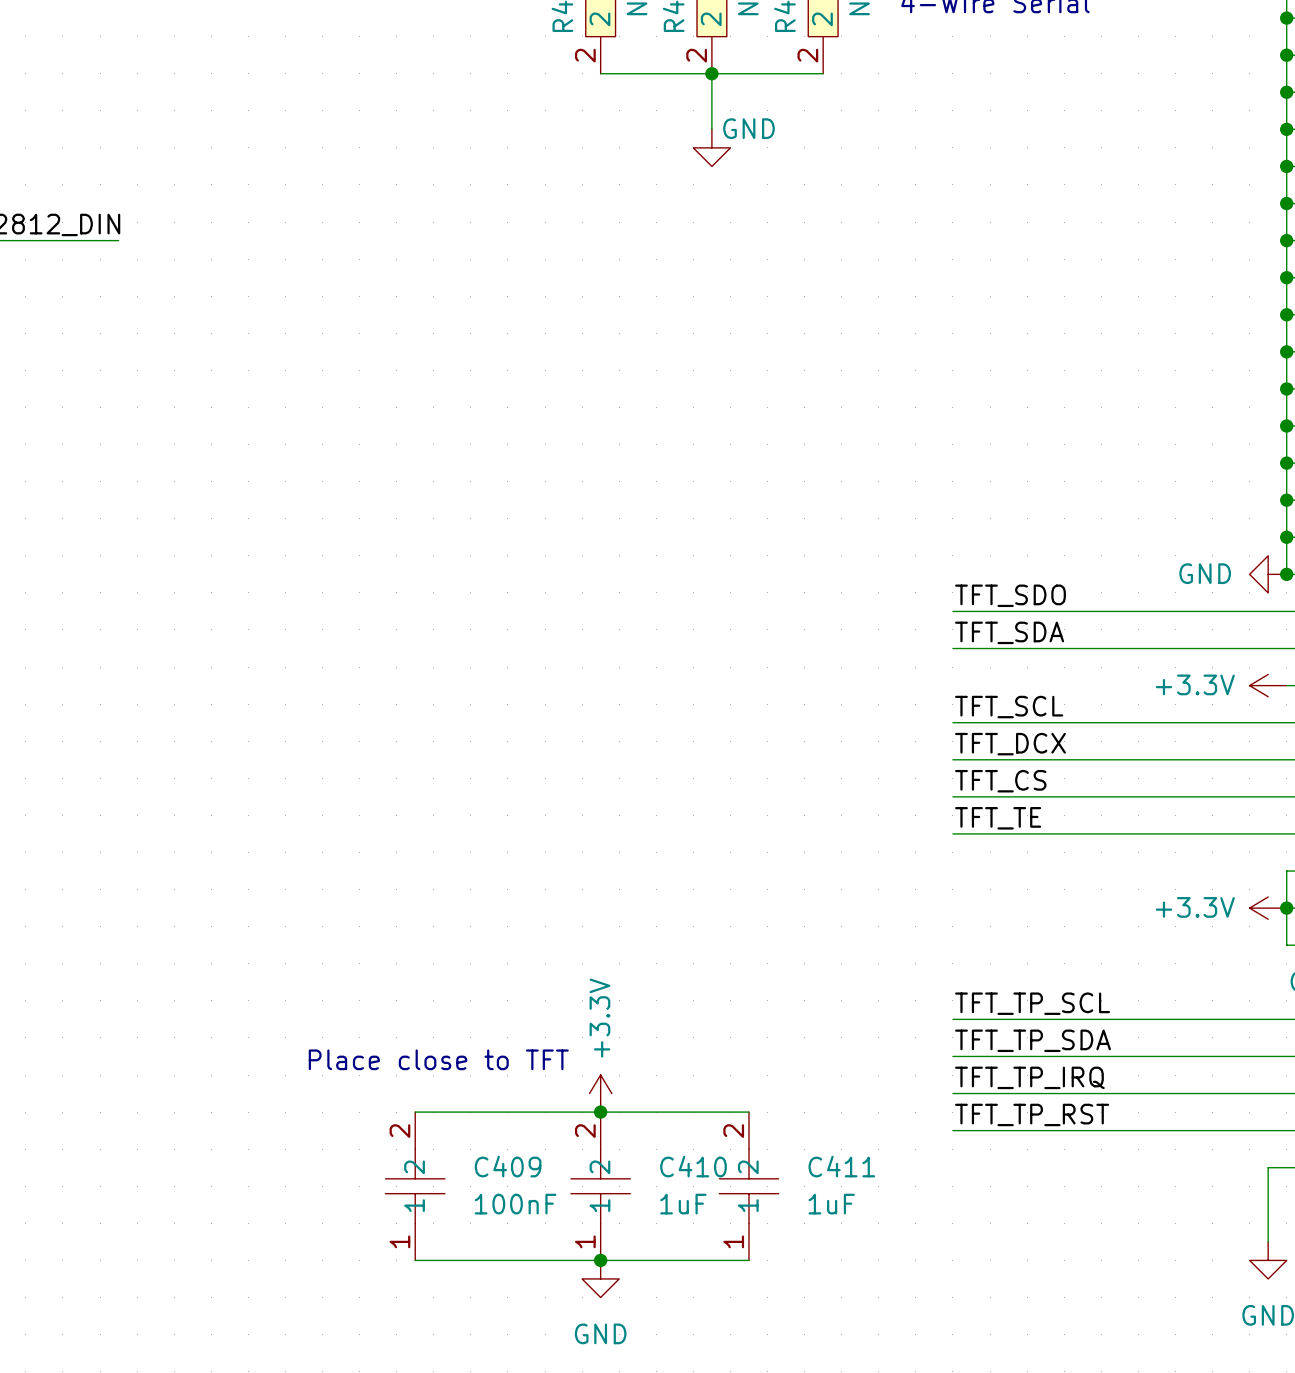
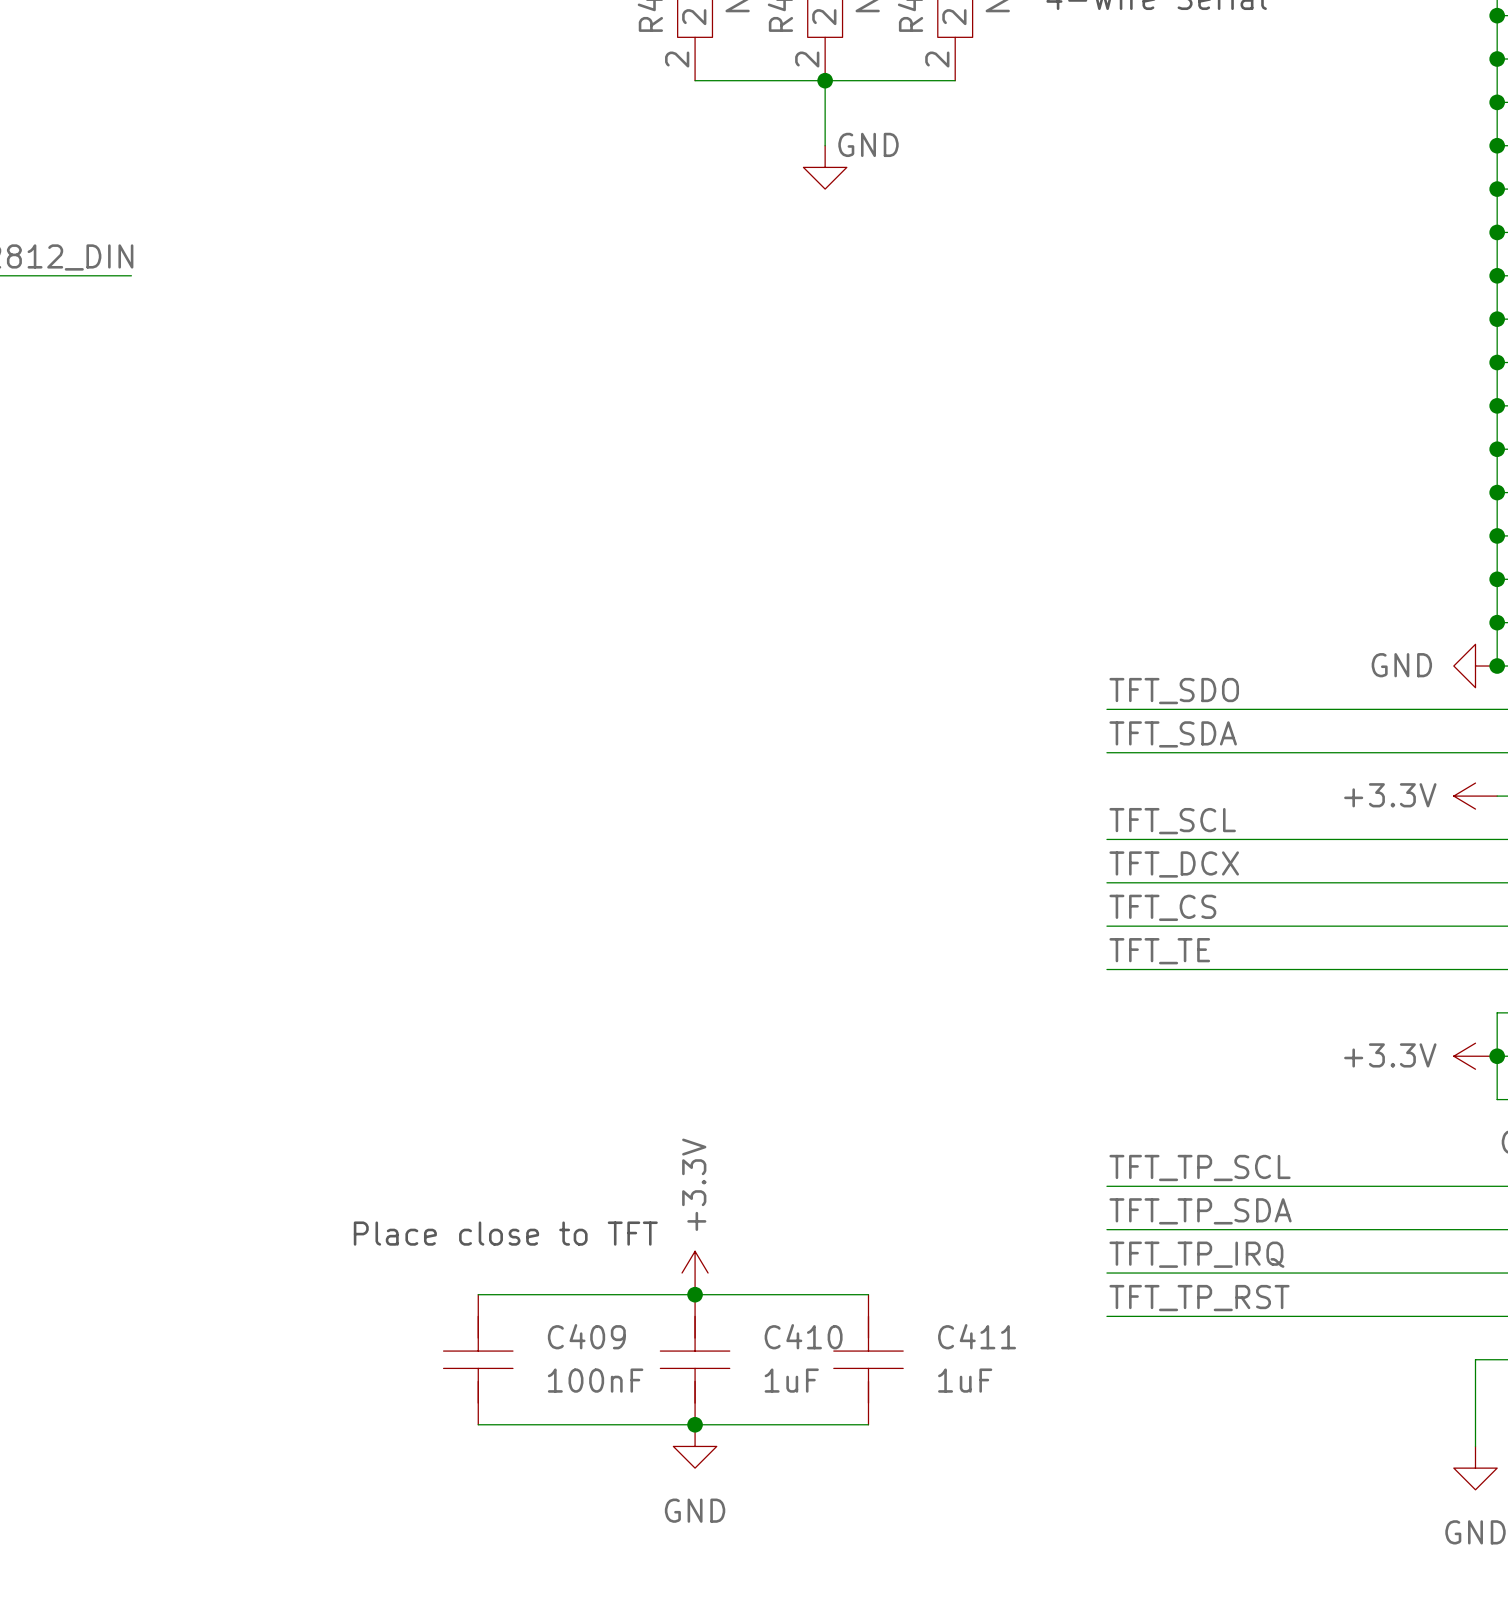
C409 symbol: [385, 1112, 445, 1261] -> [443, 1294, 513, 1425]
C410 symbol: [570, 1112, 631, 1261] -> [660, 1294, 730, 1425]
C411 symbol: [719, 1112, 779, 1261] -> [833, 1294, 904, 1425]
wire: (415, 1260) (748, 1260) -> (478, 1424) (868, 1424)
junction position: (600, 1260) -> (695, 1424)
power symbol position: GND (600, 1278) -> GND (695, 1446)

